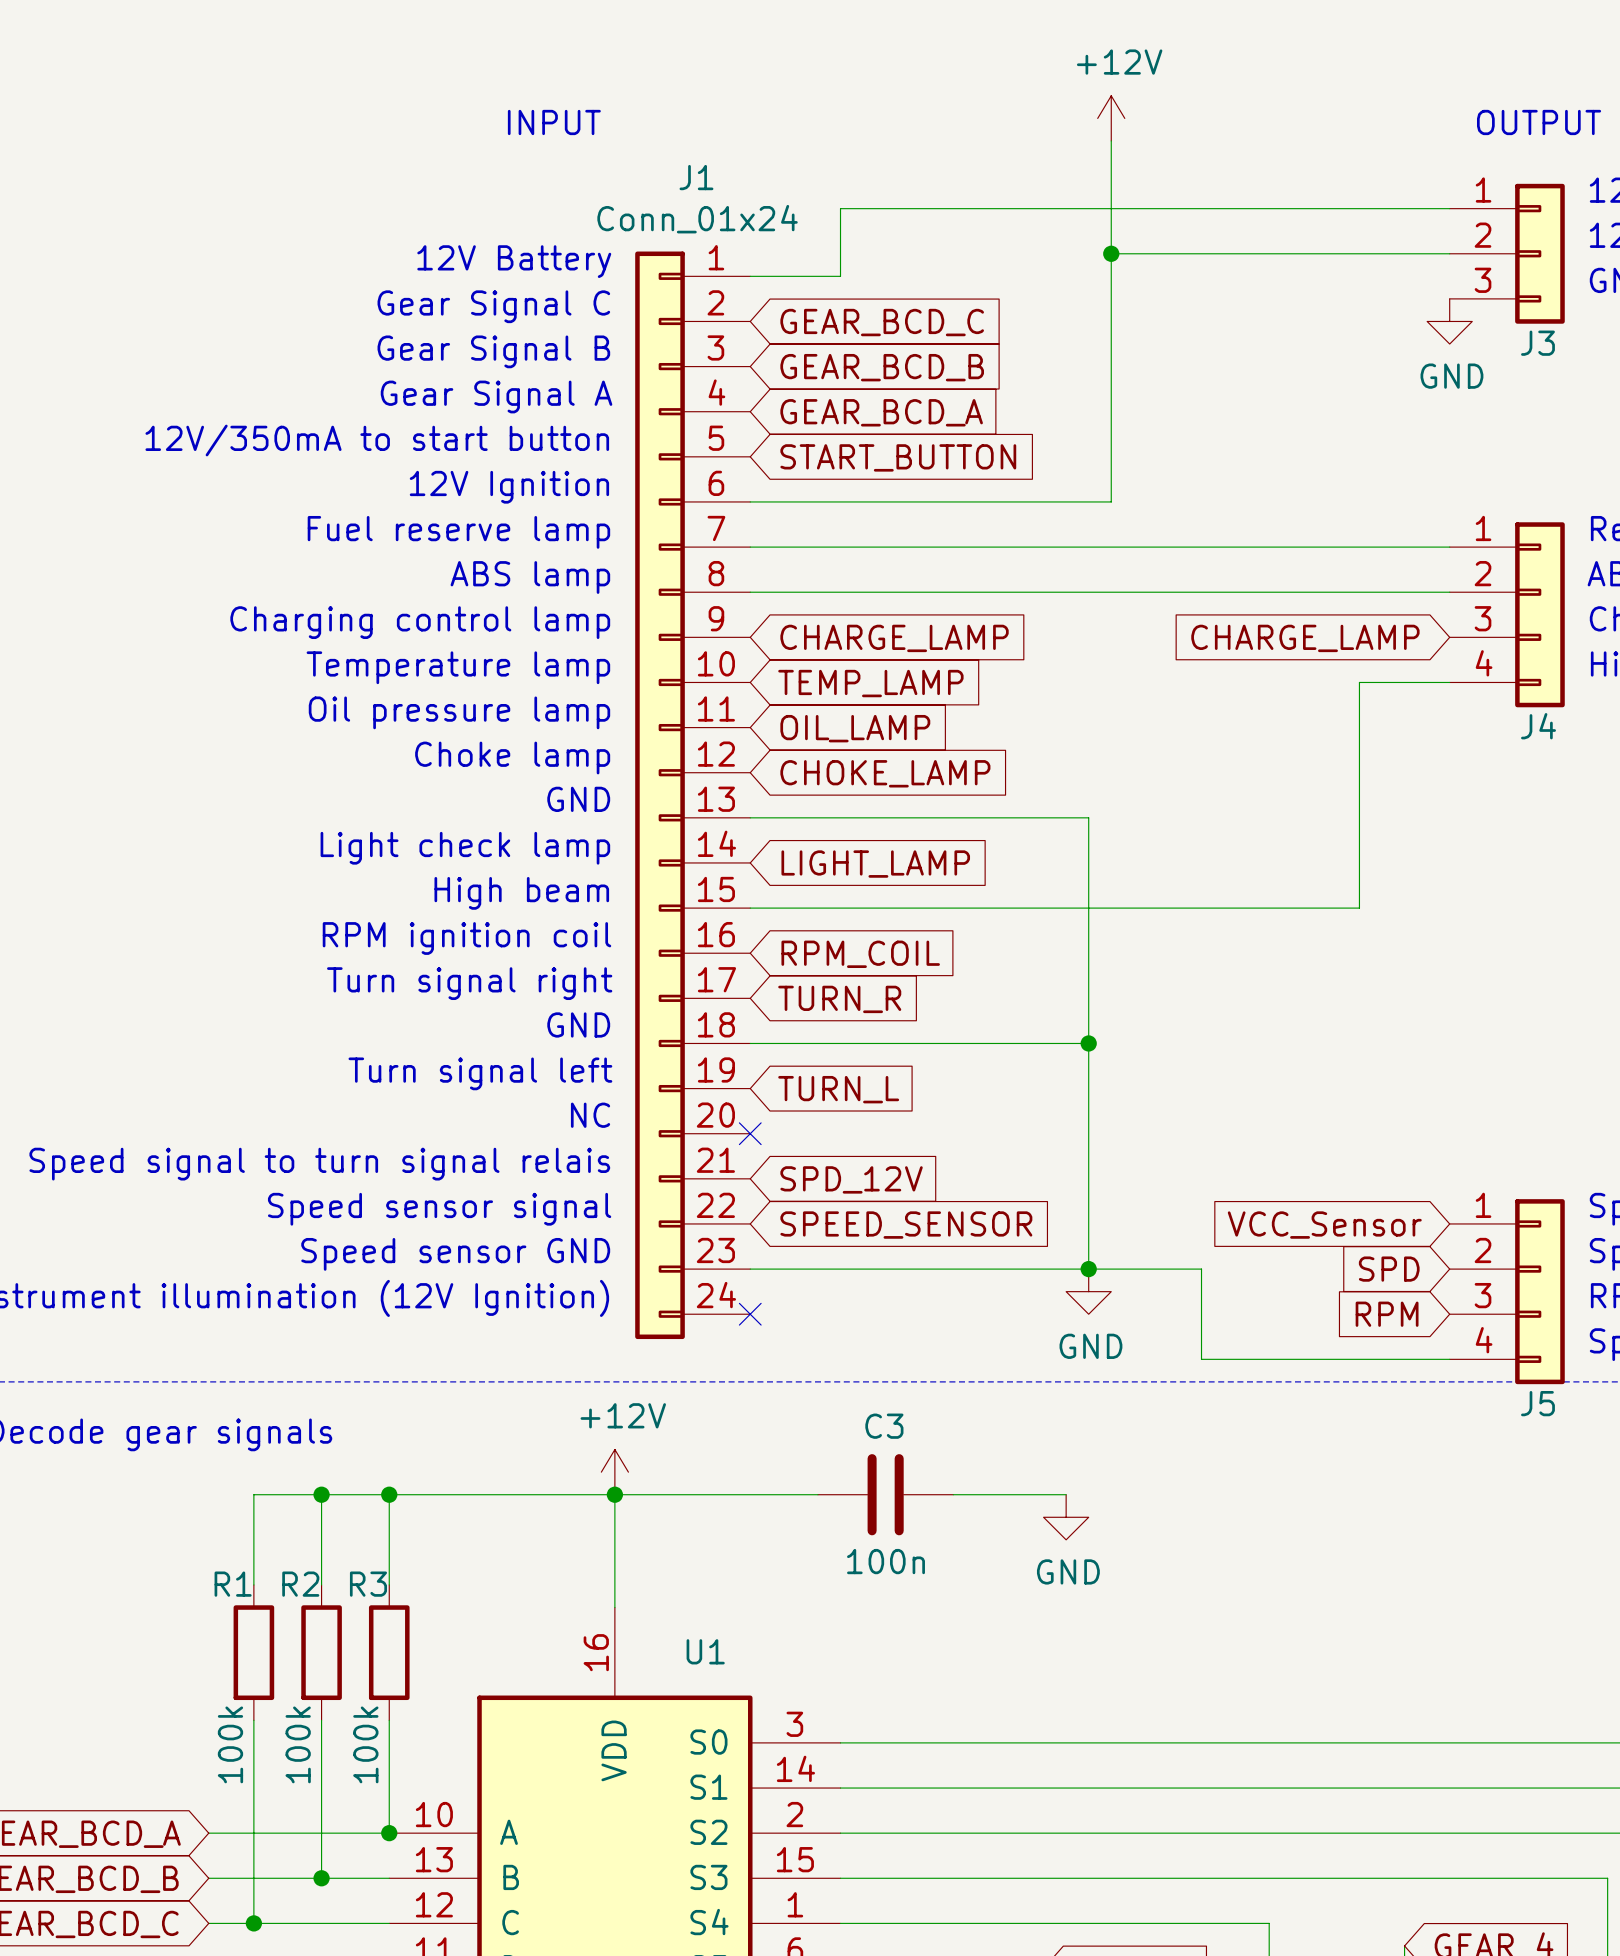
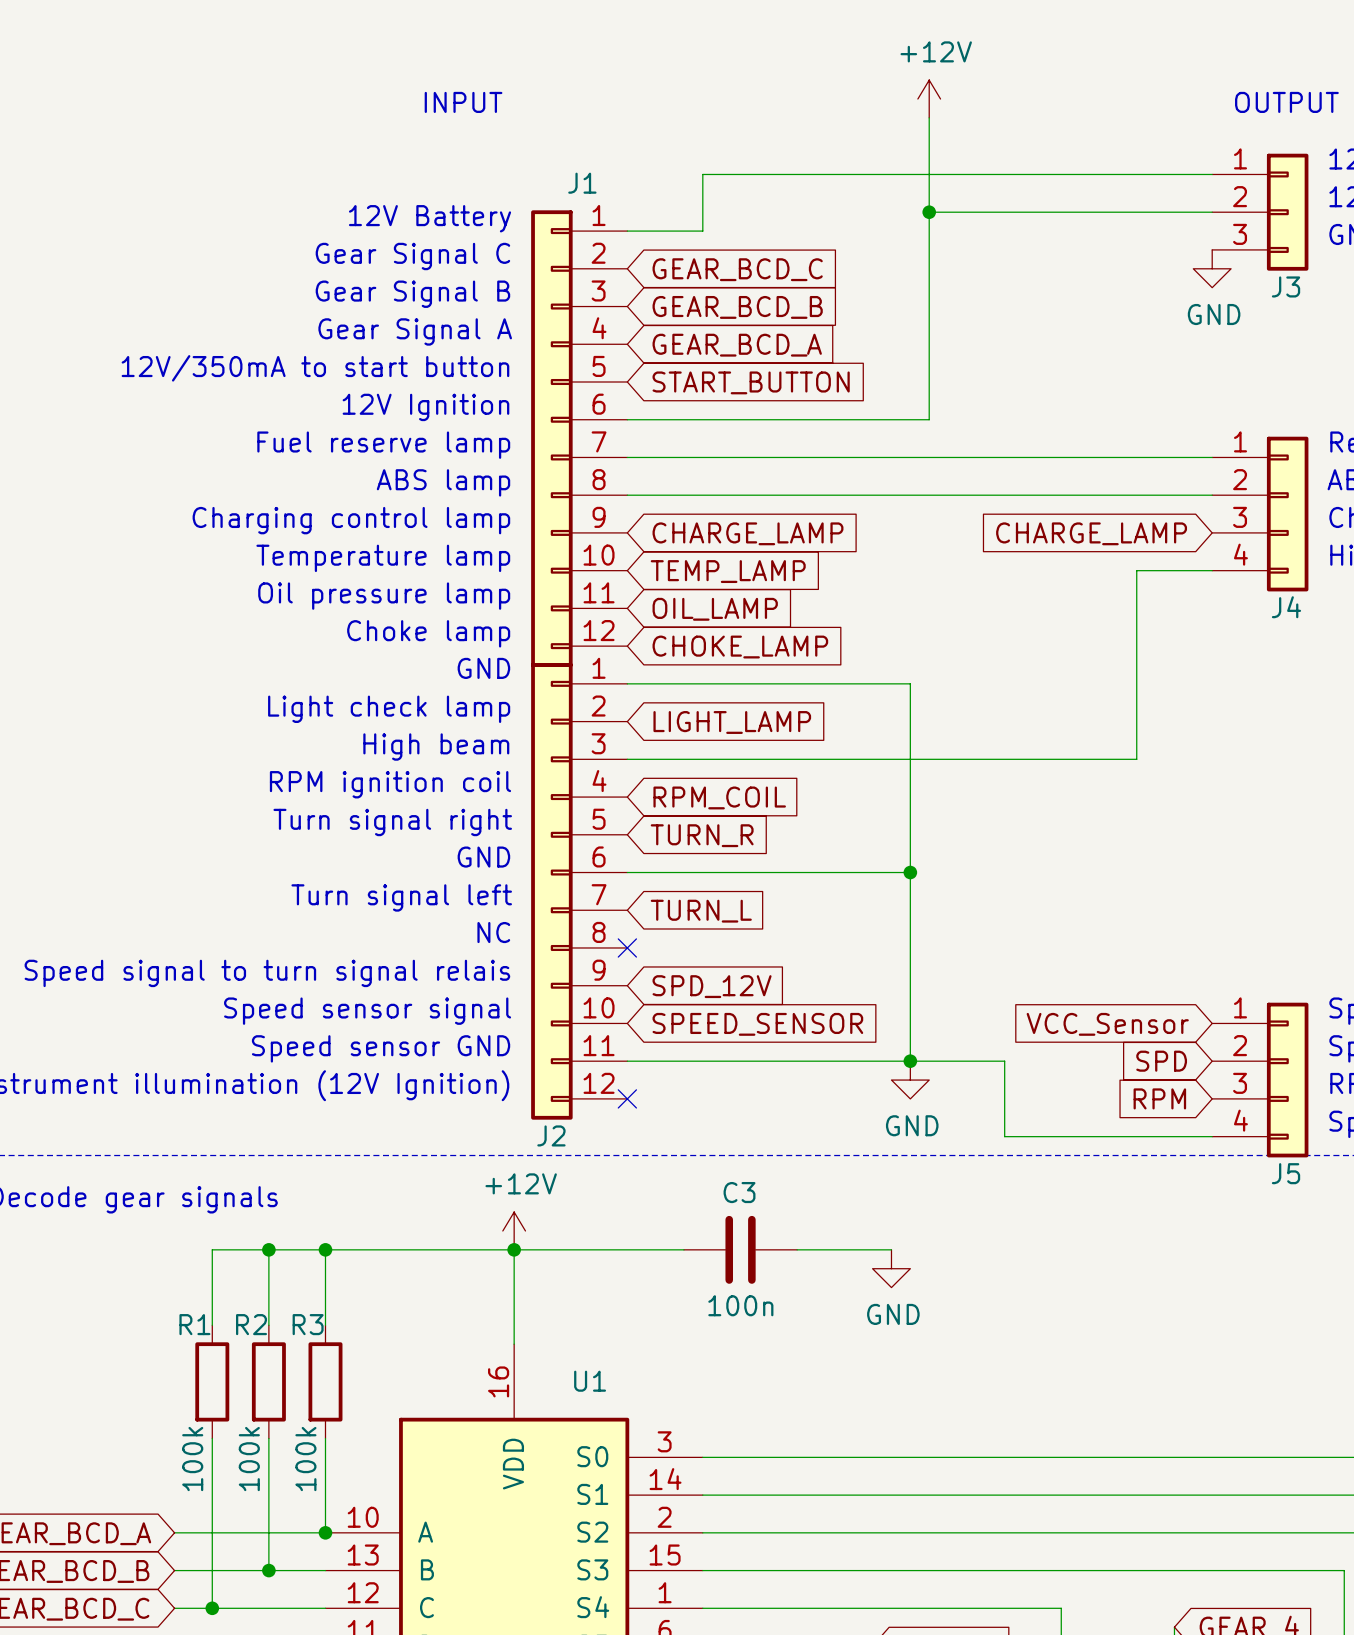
J1 name position: J1 (696, 177) -> J1 (582, 183)
J1 value: Conn_01x24 (697, 219) -> none
J1 symbol: [635, 251, 751, 1340] -> [531, 210, 628, 667]
J2: none -> (579, 891)

